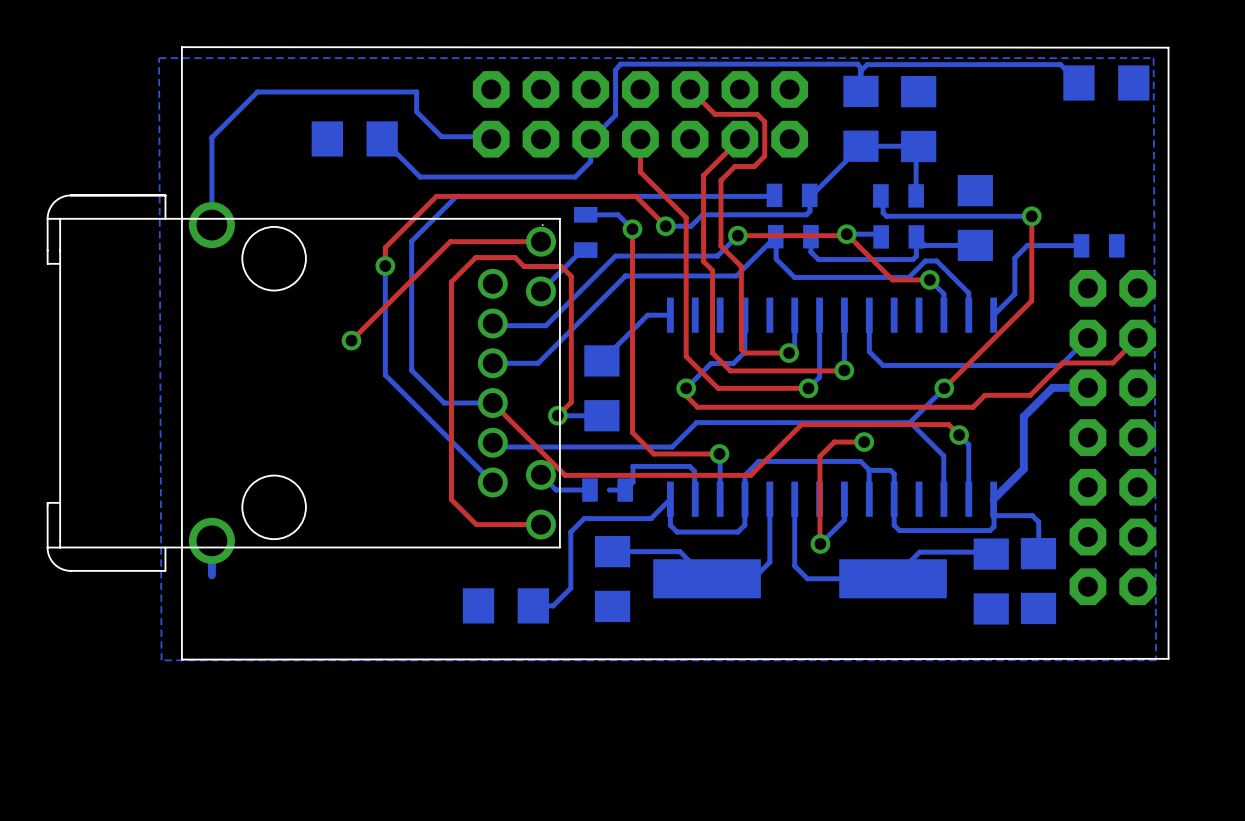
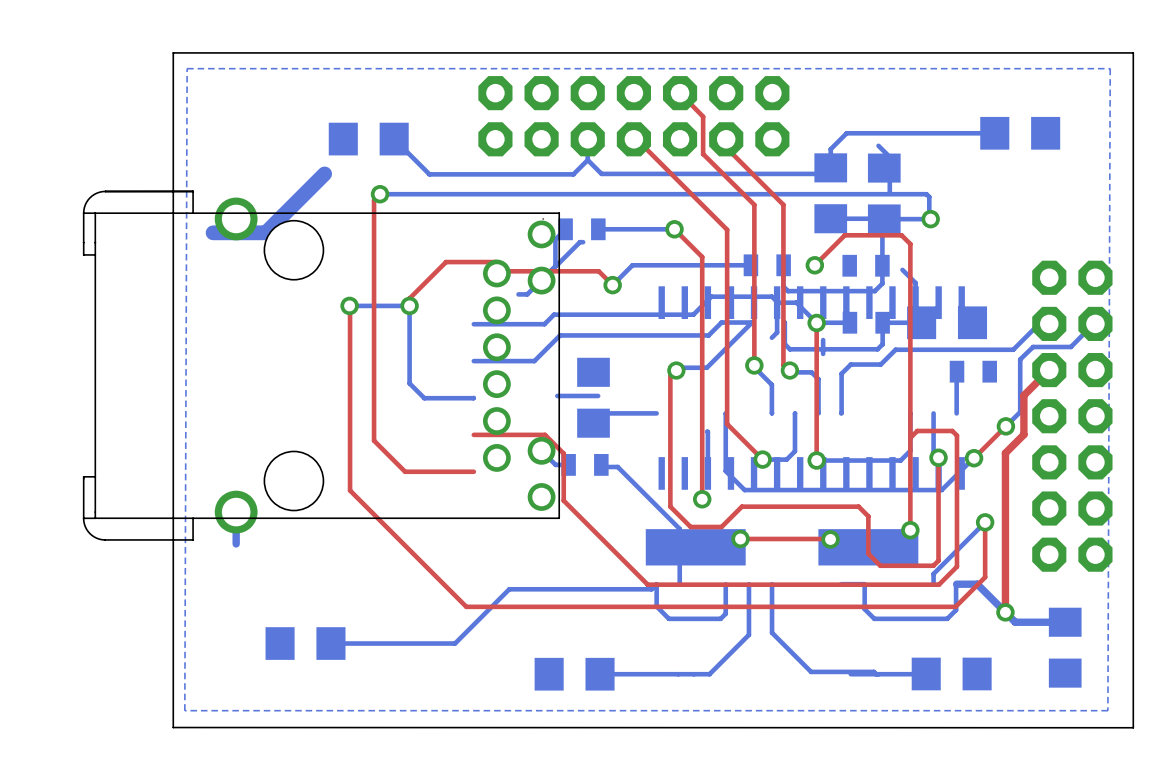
board edge: (181, 47) (1168, 47) (1168, 658) (181, 659) (181, 47) -> (173, 52) (173, 727) (1133, 727) (1133, 52) (173, 52)
bottom zone outline: (159, 58) (1153, 58) (1156, 660) (161, 660) (159, 58) -> (187, 68) (184, 710) (1107, 710) (1110, 68) (187, 68)
bottom track: (1078, 83) (1060, 64) (867, 64) (860, 70) (860, 91) (854, 97) -> none
part: (1106, 83) -> none
top track: (690, 89) (715, 114) (757, 114) (764, 121) (764, 156) (754, 166) (734, 166) (720, 180) (720, 246) (741, 266) (741, 349) (745, 353) (789, 353) -> (680, 93) (703, 116) (703, 154) (754, 204) (754, 365)
bottom track: (860, 91) (860, 68) (857, 64) (620, 64) (615, 70) (615, 115) (590, 140) -> none
part: (860, 118) -> none
part: (918, 119) -> none
bottom track: none -> (994, 133) (846, 133) (830, 149) (830, 167) (824, 173) (601, 173) (587, 160)
part: none -> (1020, 133)
bottom track: (491, 139) (488, 136) (441, 136) (416, 111) (416, 91) (257, 91) (211, 137) (211, 225) -> none
top track: (640, 139) (640, 172) (686, 217) (686, 356) (718, 388) (808, 388) -> (633, 139) (636, 139) (727, 229) (727, 424) (762, 459)
top track: (739, 139) (703, 175) (703, 261) (712, 270) (712, 353) (730, 370) (844, 370) -> (726, 139) (726, 147) (783, 204) (783, 365) (790, 372)
bottom track: (918, 146) (860, 146) (809, 195) (812, 198) -> none
bottom track: none -> (324, 173) (265, 232) (213, 232)
part footprint: [873, 184, 924, 208] -> [867, 153, 901, 234]
bottom track: (774, 195) (456, 196) (411, 241) (411, 370) (444, 403) (492, 403) -> none
part: (792, 195) -> none
bottom track: (809, 195) (809, 211) (806, 214) (702, 214) (691, 226) (665, 226) -> none
bottom track: (880, 195) (883, 198) (883, 212) (886, 216) (1031, 216) -> none
part: none -> (830, 193)
bottom track: none -> (380, 194) (926, 194) (929, 196) (930, 219) (830, 218)
top track: none -> (380, 194) (374, 200) (374, 440) (405, 471) (473, 471)
via: none -> (380, 194)
bottom track: (585, 214) (618, 214) (632, 229) -> none
top track: (1031, 216) (1031, 300) (944, 388) -> none
via: (1031, 216) -> none
part: (975, 218) -> none
bottom track: none -> (884, 218) (882, 220) (882, 283) (874, 291) (788, 291) (783, 286) (783, 265)
via: none -> (930, 219)
top track: (665, 226) (635, 196) (436, 196) (385, 247) (385, 266) -> none
via: (665, 226) -> none
top track: (632, 229) (632, 432) (653, 453) (719, 453) -> none
via: (632, 229) -> none
part rotation: 0° (585, 232) -> 90° clockwise (581, 229)
bottom track: (846, 234) (878, 234) (881, 236) -> none
via: (846, 234) -> none
bottom track: (737, 235) (717, 256) (615, 256) (545, 325) (494, 325) (492, 323) -> none
top track: (737, 235) (846, 234) (892, 279) (929, 279) -> none
via: (737, 235) -> none
bottom track: none -> (565, 229) (555, 239) (555, 266) (527, 294) (518, 294)
bottom track: none -> (598, 229) (674, 229)
top track: none -> (674, 229) (702, 256) (702, 499)
via: none -> (674, 229)
part position: (793, 236) -> (767, 265)
bottom track: (810, 236) (810, 252) (818, 259) (912, 259) (916, 256) (916, 236) (924, 245) (975, 245) -> none
part position: (898, 236) -> (866, 265)
top track: (540, 241) (450, 241) (351, 340) -> none
bottom track: (1081, 245) (1027, 245) (1014, 258) (1014, 293) (993, 315) -> none
part: (1099, 245) -> none
bottom track: (385, 266) (385, 375) (492, 482) -> none
via: (385, 266) -> none
bottom track: none -> (750, 265) (632, 265) (612, 285)
top track: none -> (814, 265) (844, 235) (901, 235) (910, 244) (910, 530)
via: none -> (814, 265)
via: (929, 279) -> none
top track: none -> (612, 285) (598, 271) (505, 271) (495, 262) (446, 262) (409, 298) (409, 305)
via: none -> (612, 285)
bottom track: (670, 315) (647, 315) (601, 360) -> none
bottom track: (744, 315) (744, 352) (733, 363) (711, 363) (686, 388) -> none
bottom track: (819, 315) (819, 377) (808, 388) -> none
bottom track: (844, 315) (844, 355) -> none
bottom track: (869, 315) (869, 351) (883, 365) -> (784, 322) (784, 344) (789, 349) (859, 349)
bottom track: (968, 315) (968, 293) (936, 261) (925, 261) (908, 277) (794, 277) (776, 259) (775, 236) (736, 275) (625, 275) (538, 363) (492, 363) -> none
bottom track: none -> (349, 305) (409, 305) (409, 383) (424, 398) (473, 398)
top track: none -> (349, 305) (350, 490) (466, 606) (955, 606) (985, 577) (985, 522)
via: none -> (349, 305)
via: none -> (409, 305)
bottom track: none -> (816, 322) (849, 322)
part: none -> (866, 322)
bottom track: none -> (921, 322) (882, 322) (882, 344) (877, 349)
part: none -> (947, 322)
bottom track: none -> (816, 322) (796, 302) (777, 302) (771, 296) (711, 296) (693, 314) (554, 314) (544, 324) (473, 324)
top track: none -> (816, 322) (816, 460)
via: none -> (816, 322)
bottom track: (1087, 338) (1060, 365) (902, 365) -> (1049, 323) (1039, 323) (1013, 349) (895, 349) (880, 364) (850, 364) (841, 373) (841, 413)
bottom track: none -> (1095, 323) (1070, 346) (1033, 346) (1020, 359) (1020, 412) (1005, 426)
top track: (1137, 338) (1112, 362) (1062, 362) (1030, 395) (985, 395) (973, 407) (697, 407) (686, 395) (686, 388) -> none
via: (351, 340) -> none
via: (789, 353) -> none
via: (844, 370) -> none
bottom track: none -> (473, 361) (534, 361) (560, 335) (708, 335) (721, 322) (752, 322) (706, 367) (670, 367)
bottom track: none -> (754, 365) (771, 384) (771, 413)
via: none -> (754, 365)
top track: none -> (670, 367) (670, 506) (690, 526) (721, 526) (741, 506) (858, 506) (868, 516) (868, 553) (880, 565) (933, 565) (938, 560) (938, 457)
bottom track: (1087, 387) (1052, 387) (1023, 416) (1023, 469) (993, 499) (993, 526) (990, 530) (899, 530) (894, 525) (894, 474) (890, 470) (869, 471) -> none
top track: none -> (1049, 370) (1023, 395) (1023, 434) (1005, 453) (1005, 612)
part position: (601, 388) -> (593, 397)
bottom track: (944, 388) (910, 422) -> none
via: (944, 388) -> none
bottom track: none -> (957, 371) (956, 413)
part: none -> (973, 371)
bottom track: none -> (790, 372) (811, 372) (818, 379) (818, 413)
top track: (492, 403) (565, 475) (750, 475) (801, 424) (948, 424) (959, 435) -> none
top track: (557, 415) (571, 402) (571, 276) (561, 266) (524, 266) (515, 257) (475, 257) (451, 281) (451, 499) (476, 524) (540, 524) -> none
via: (557, 415) -> none
bottom track: (910, 422) (696, 422) (672, 447) (497, 447) (492, 442) -> none
bottom track: (910, 422) (943, 455) (943, 499) -> none
bottom track: none -> (656, 413) (594, 413) (593, 423)
bottom track: none -> (725, 413) (725, 471) (744, 490) (941, 490) (974, 458)
bottom track: none -> (794, 413) (794, 451) (786, 459) (762, 459)
bottom track: none -> (910, 413) (910, 450) (900, 460) (816, 460)
bottom track: none -> (933, 413) (933, 452) (938, 457)
bottom track: (959, 435) (968, 444) (968, 499) -> none
via: (959, 435) -> none
top track: (864, 442) (834, 442) (819, 456) (820, 543) -> none
via: (864, 442) -> none
top track: none -> (1005, 426) (974, 458)
via: none -> (1005, 426)
via: (719, 453) -> none
top track: none -> (473, 434) (545, 434) (563, 453) (563, 500) (647, 584) (938, 584) (956, 566) (956, 435) (952, 430) (917, 430) (910, 437)
via: none -> (938, 457)
via: none -> (974, 458)
via: none -> (762, 459)
via: none -> (816, 460)
bottom track: (570, 490) (589, 490) -> none
bottom track: none -> (601, 464) (603, 466) (617, 466) (679, 528) (679, 584)
part position: (607, 490) -> (584, 464)
bottom track: (609, 490) (625, 490) (632, 482) (632, 466) (689, 466) (694, 471) (695, 499) -> none
bottom track: (744, 499) (744, 525) (737, 532) (677, 532) (670, 525) (670, 499) (651, 518) (584, 518) (570, 532) (570, 588) (553, 605) (533, 605) -> none
bottom track: (745, 499) (745, 475) (758, 461) (860, 461) (869, 469) (869, 499) -> none
bottom track: (769, 499) (769, 562) (753, 578) (707, 578) (679, 551) (612, 551) -> none
bottom track: (794, 499) (794, 566) (807, 578) (893, 578) (919, 552) (989, 552) (991, 554) -> none
bottom track: (844, 499) (844, 519) (820, 543) -> none
bottom track: (993, 517) (1032, 515) (1038, 522) (1038, 553) -> none
via: none -> (702, 499)
via: (820, 543) -> none
bottom track: none -> (985, 522) (933, 573) (933, 584)
via: none -> (985, 522)
via: none -> (910, 530)
top track: none -> (740, 538) (830, 539)
via: none -> (740, 538)
via: none -> (830, 539)
part: (612, 579) -> none
part: (991, 581) -> none
part: (1038, 581) -> none
part: (505, 605) -> none
bottom track: none -> (725, 584) (725, 613) (720, 618) (668, 618) (656, 606) (656, 584) (651, 589) (509, 589) (455, 643) (330, 643)
bottom track: none -> (748, 584) (748, 634) (709, 674) (600, 674)
bottom track: none -> (772, 584) (772, 632) (811, 671) (873, 671) (876, 674)
bottom track: none -> (841, 584) (864, 584) (864, 609) (874, 618) (947, 618) (956, 610) (956, 584) (977, 584) (1015, 622) (1065, 622)
via: none -> (1005, 612)
part: none -> (305, 643)
part: none -> (1065, 647)
part: none -> (574, 674)
bottom track: none -> (850, 674) (926, 674)
part: none -> (951, 673)

